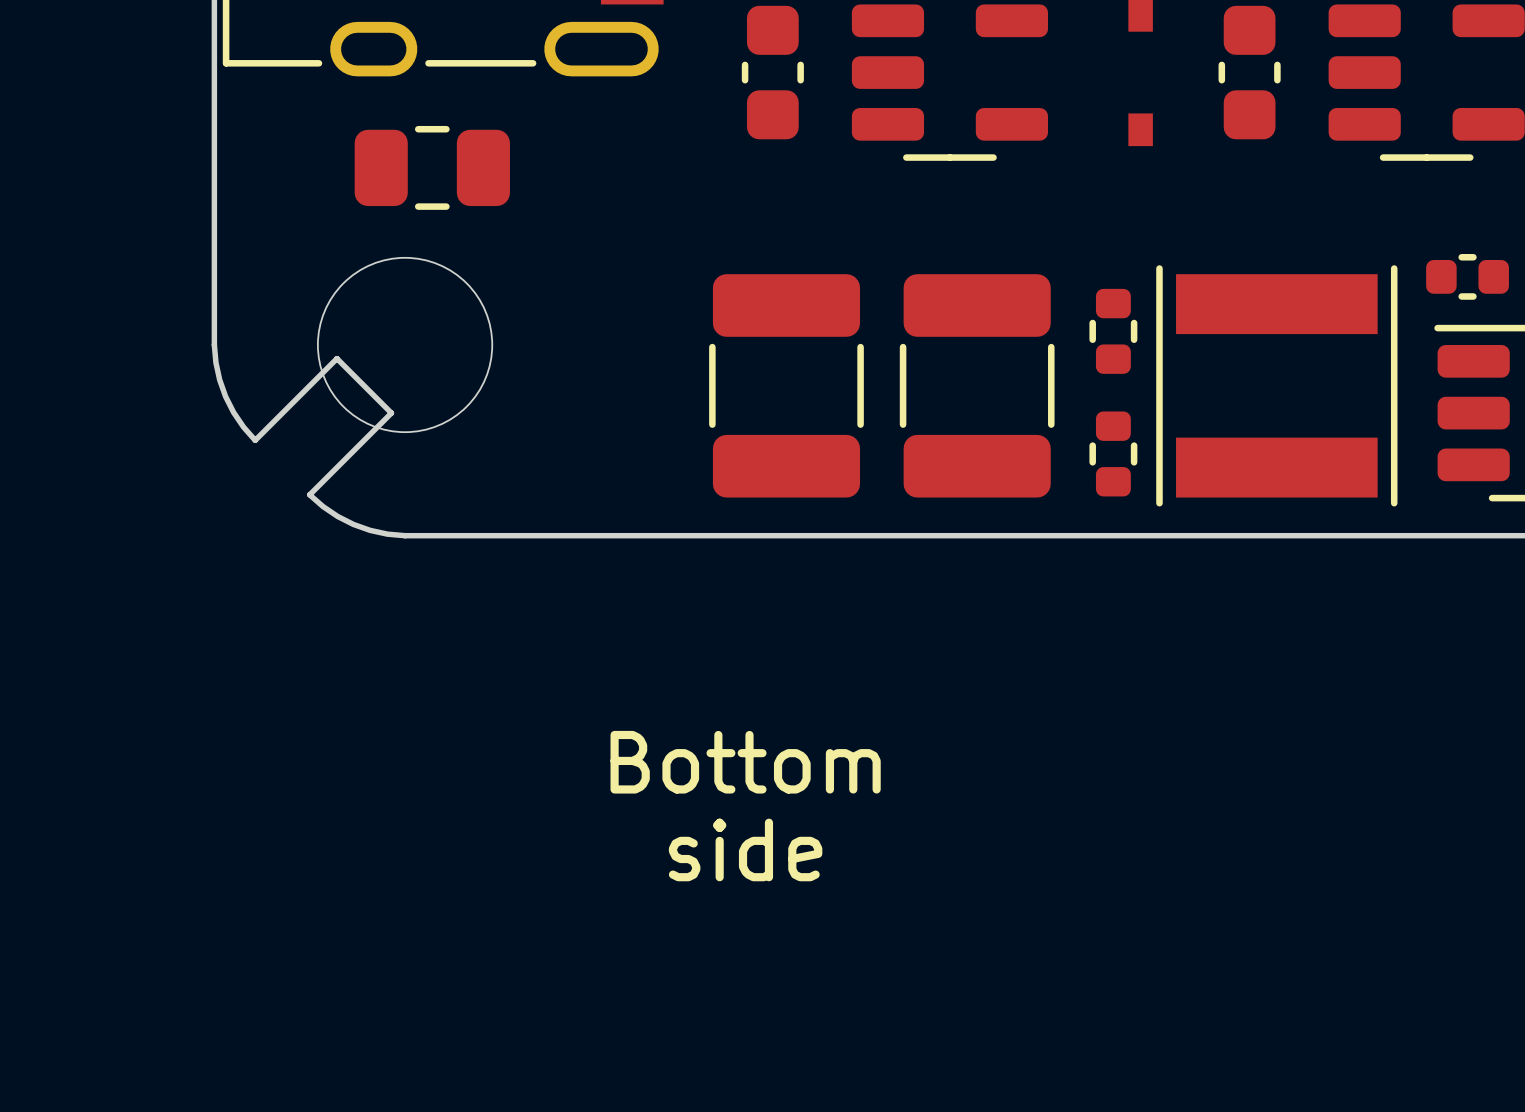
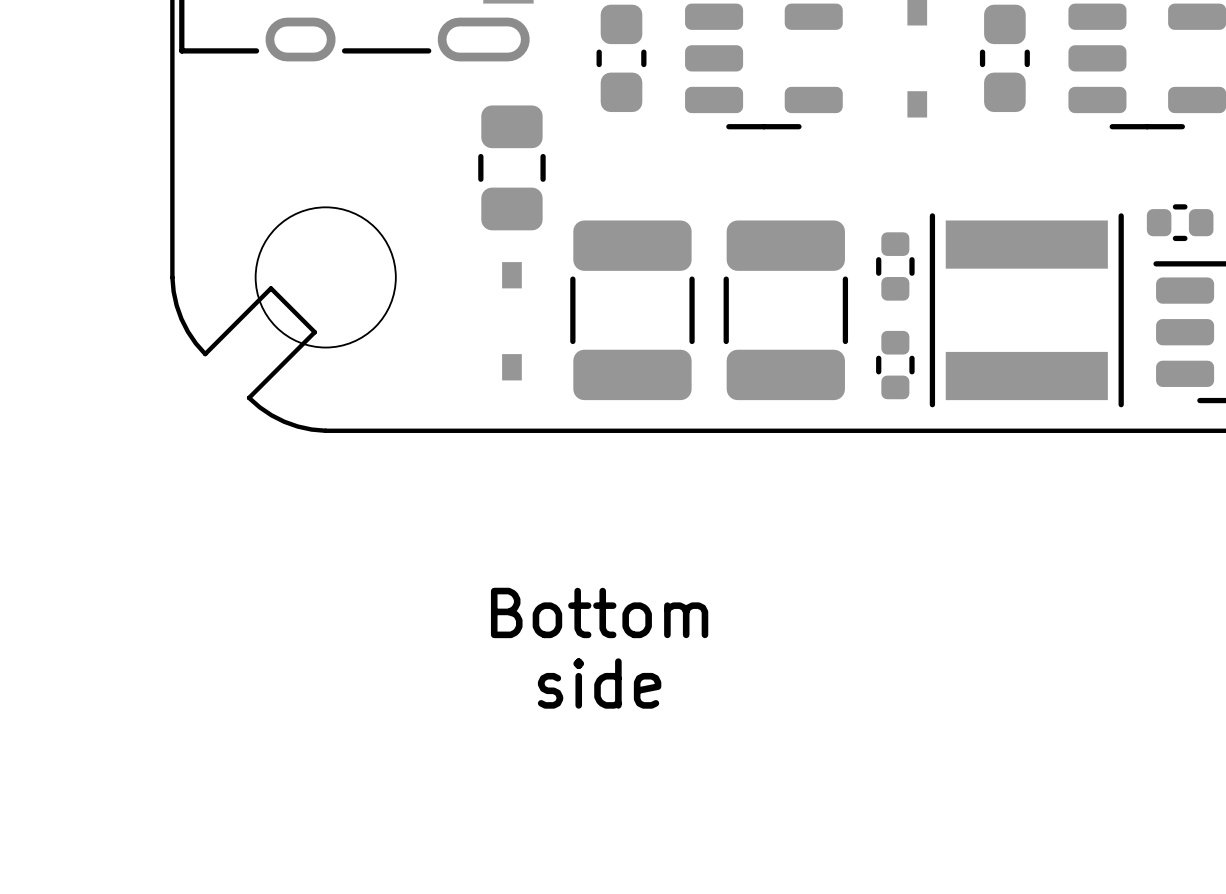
part rotation: 0° (432, 167) -> 90° clockwise (511, 167)
part position: (432, 167) -> (511, 167)
part: none -> (511, 321)

